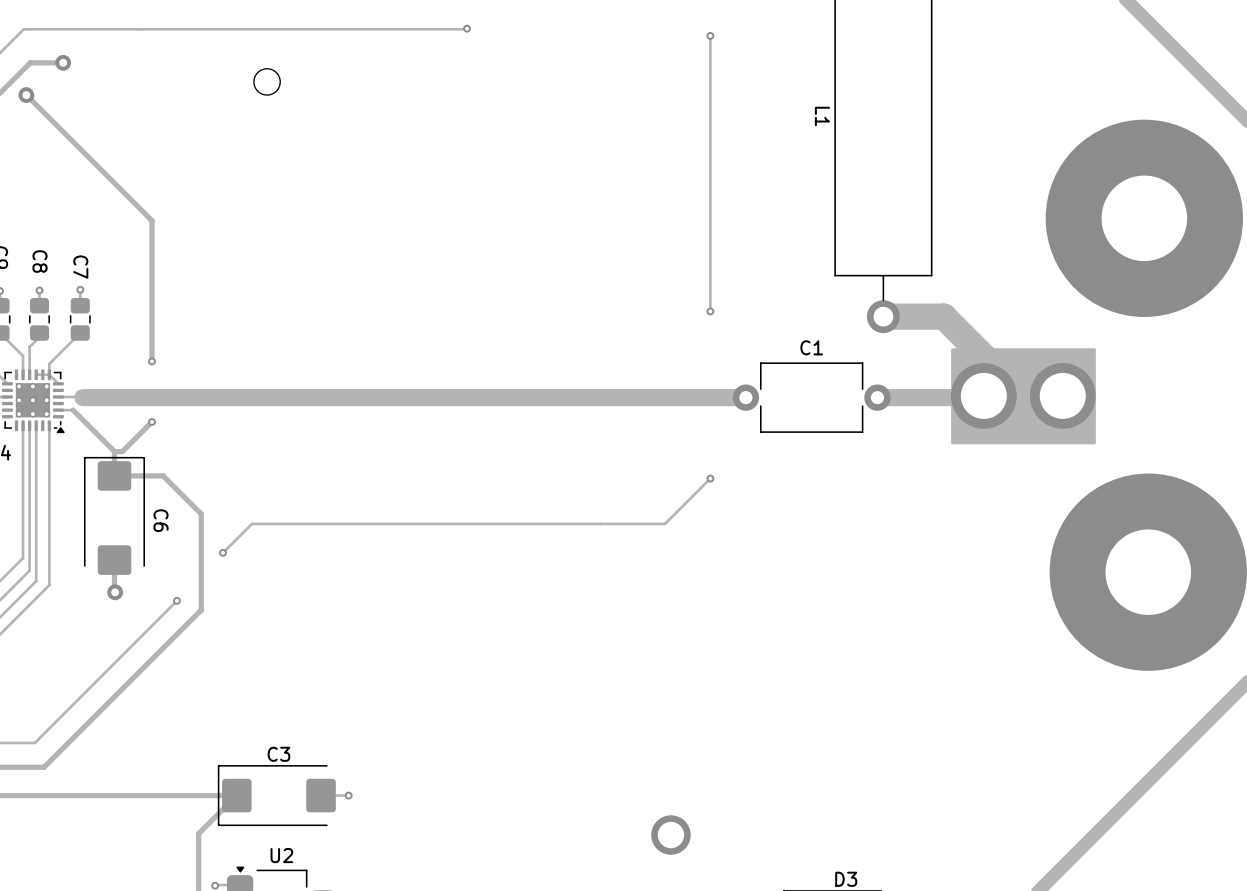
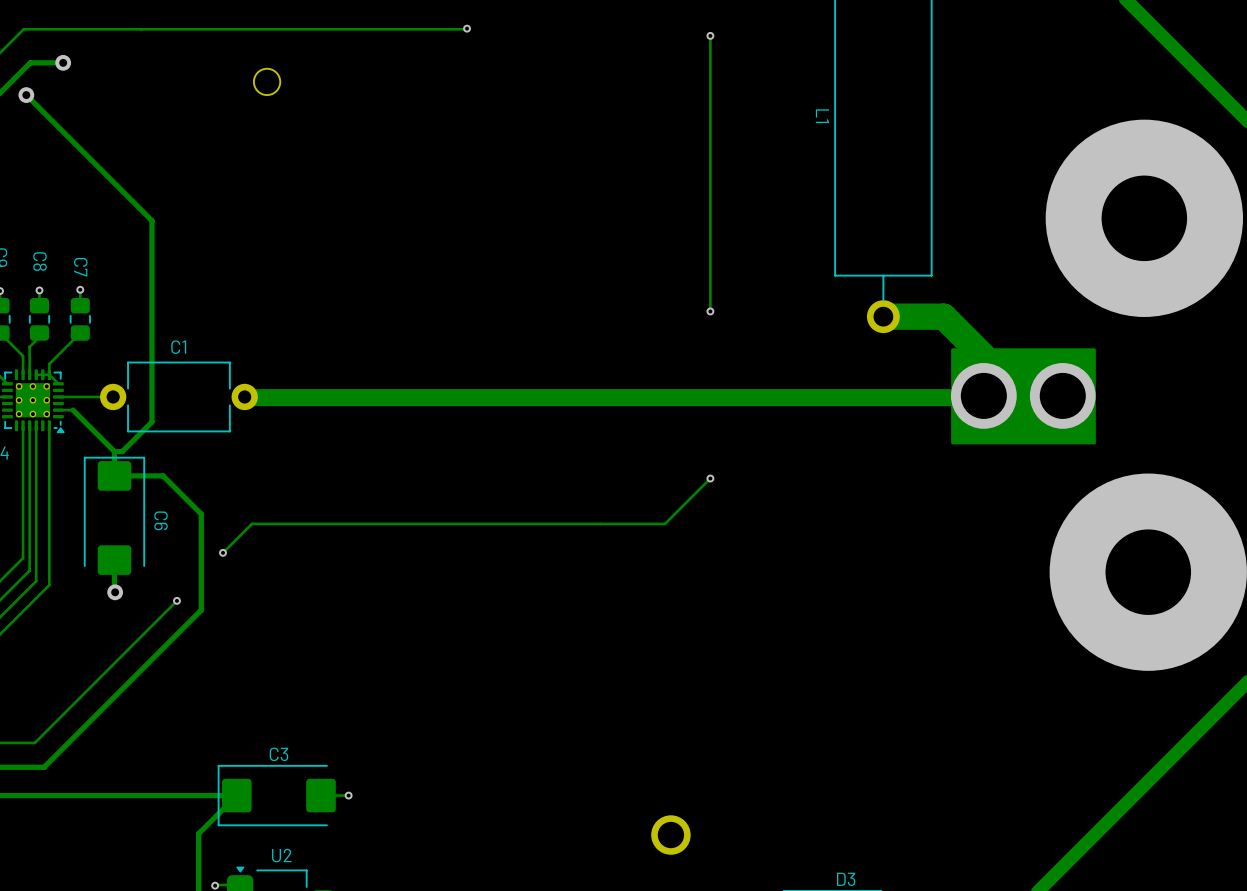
track: none -> (151, 361) (151, 421)
via: (151, 361) -> none
track: (82, 396) (245, 397) -> (82, 396) (113, 396)
C1 position: (811, 397) -> (178, 396)
track: none -> (877, 397) (745, 397)
via: (151, 421) -> none

